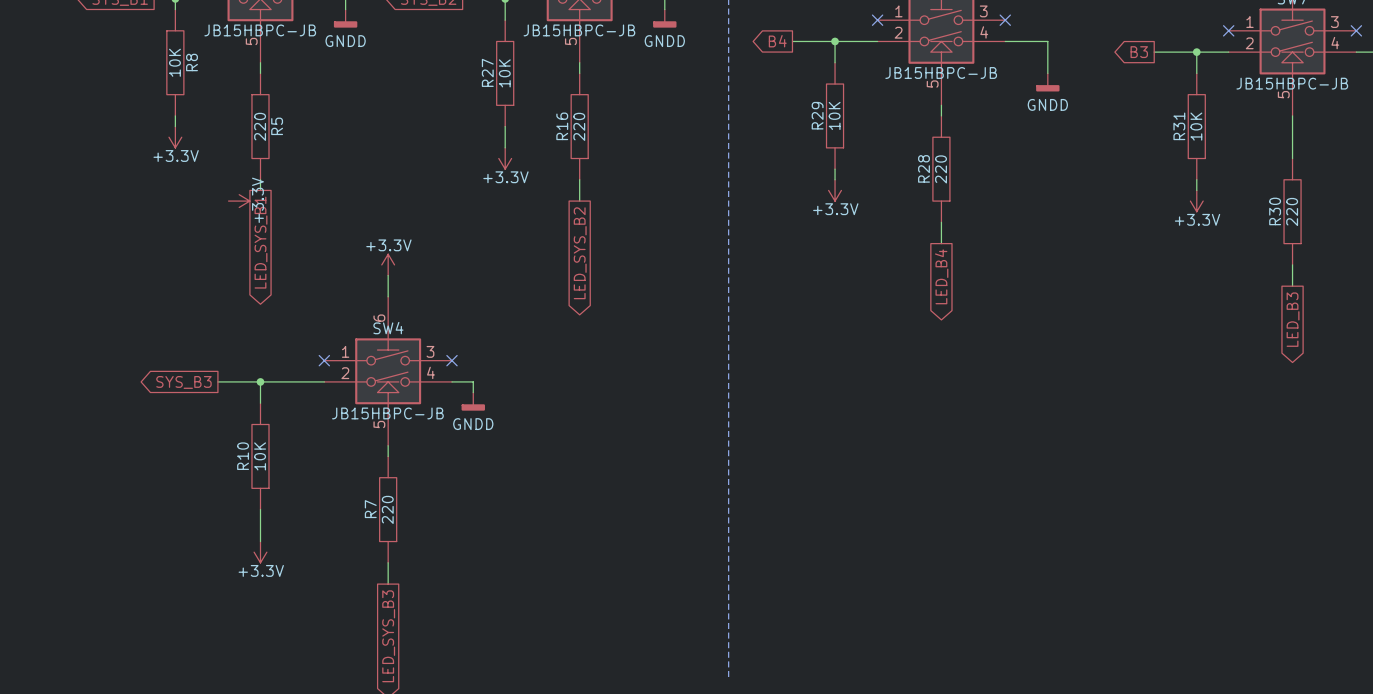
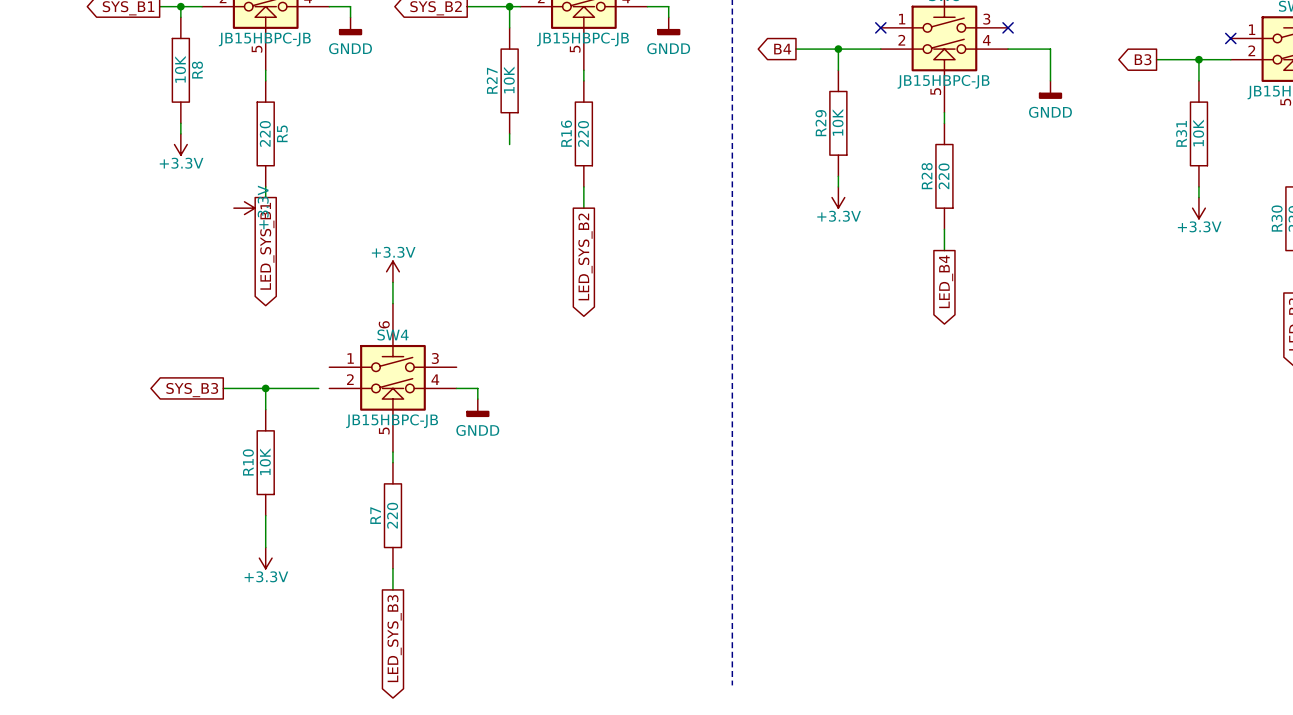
wire: (505, 137) (505, 147) -> none
power symbol: +3.3V (505, 158) -> none
no-connect mark: (324, 360) -> none
no-connect mark: (452, 360) -> none
wire: (313, 381) (324, 381) -> none

